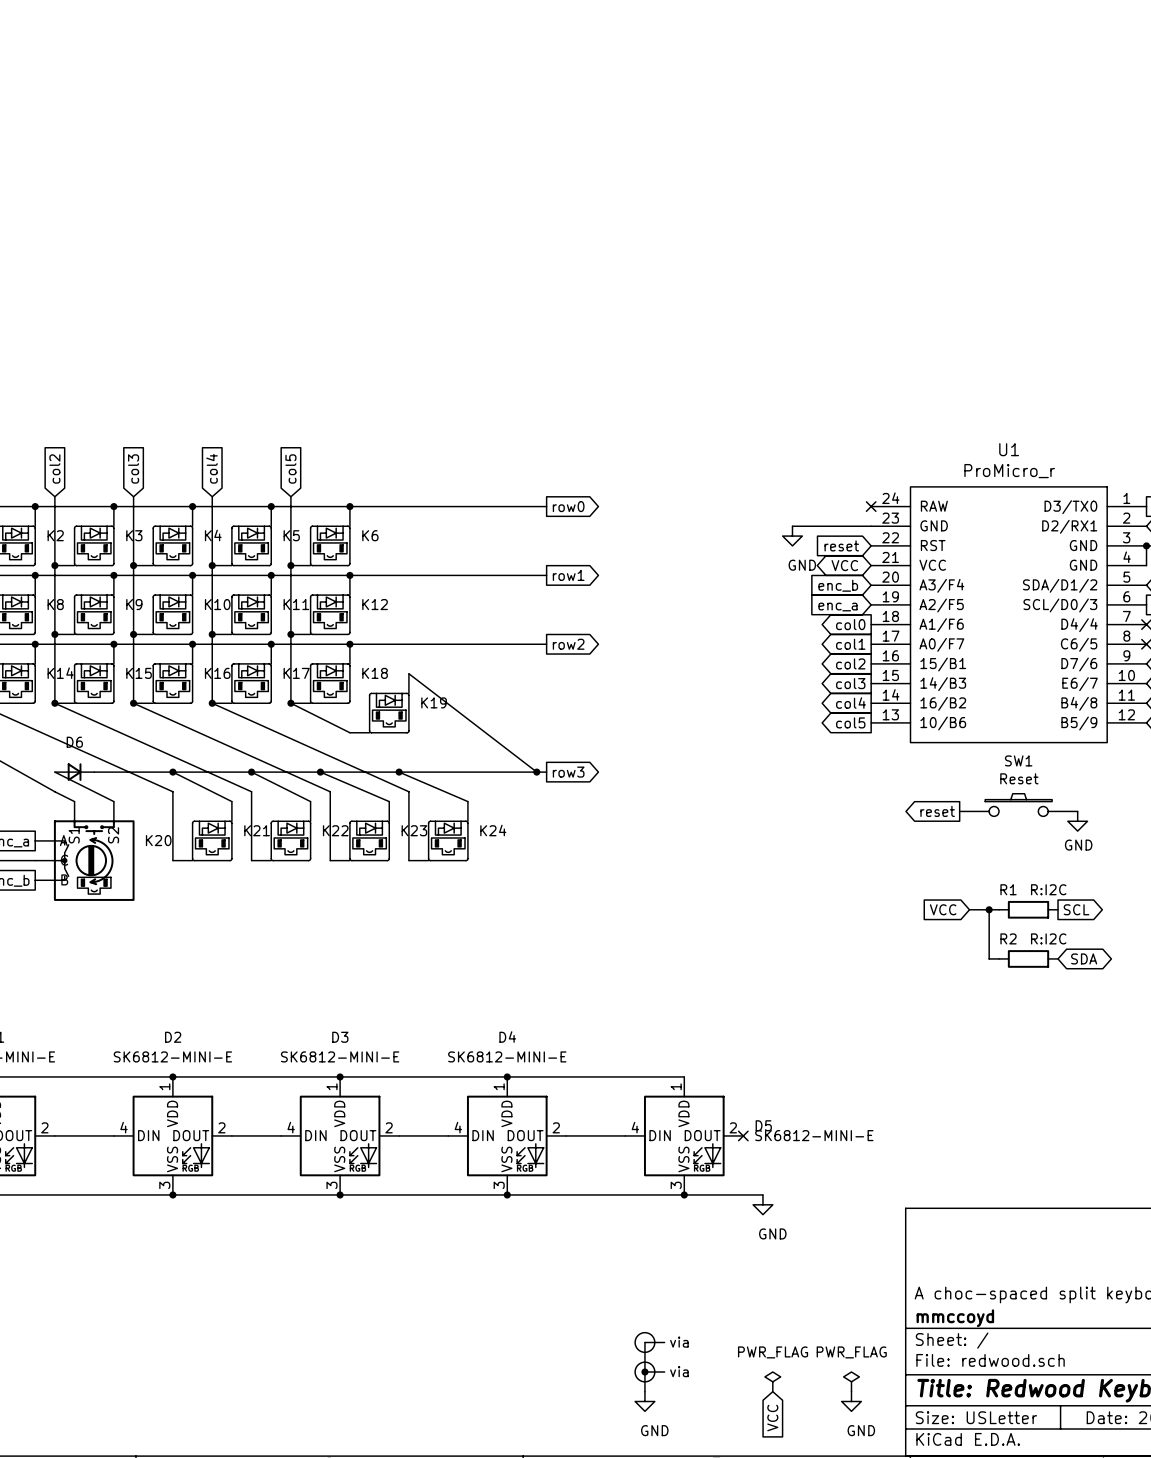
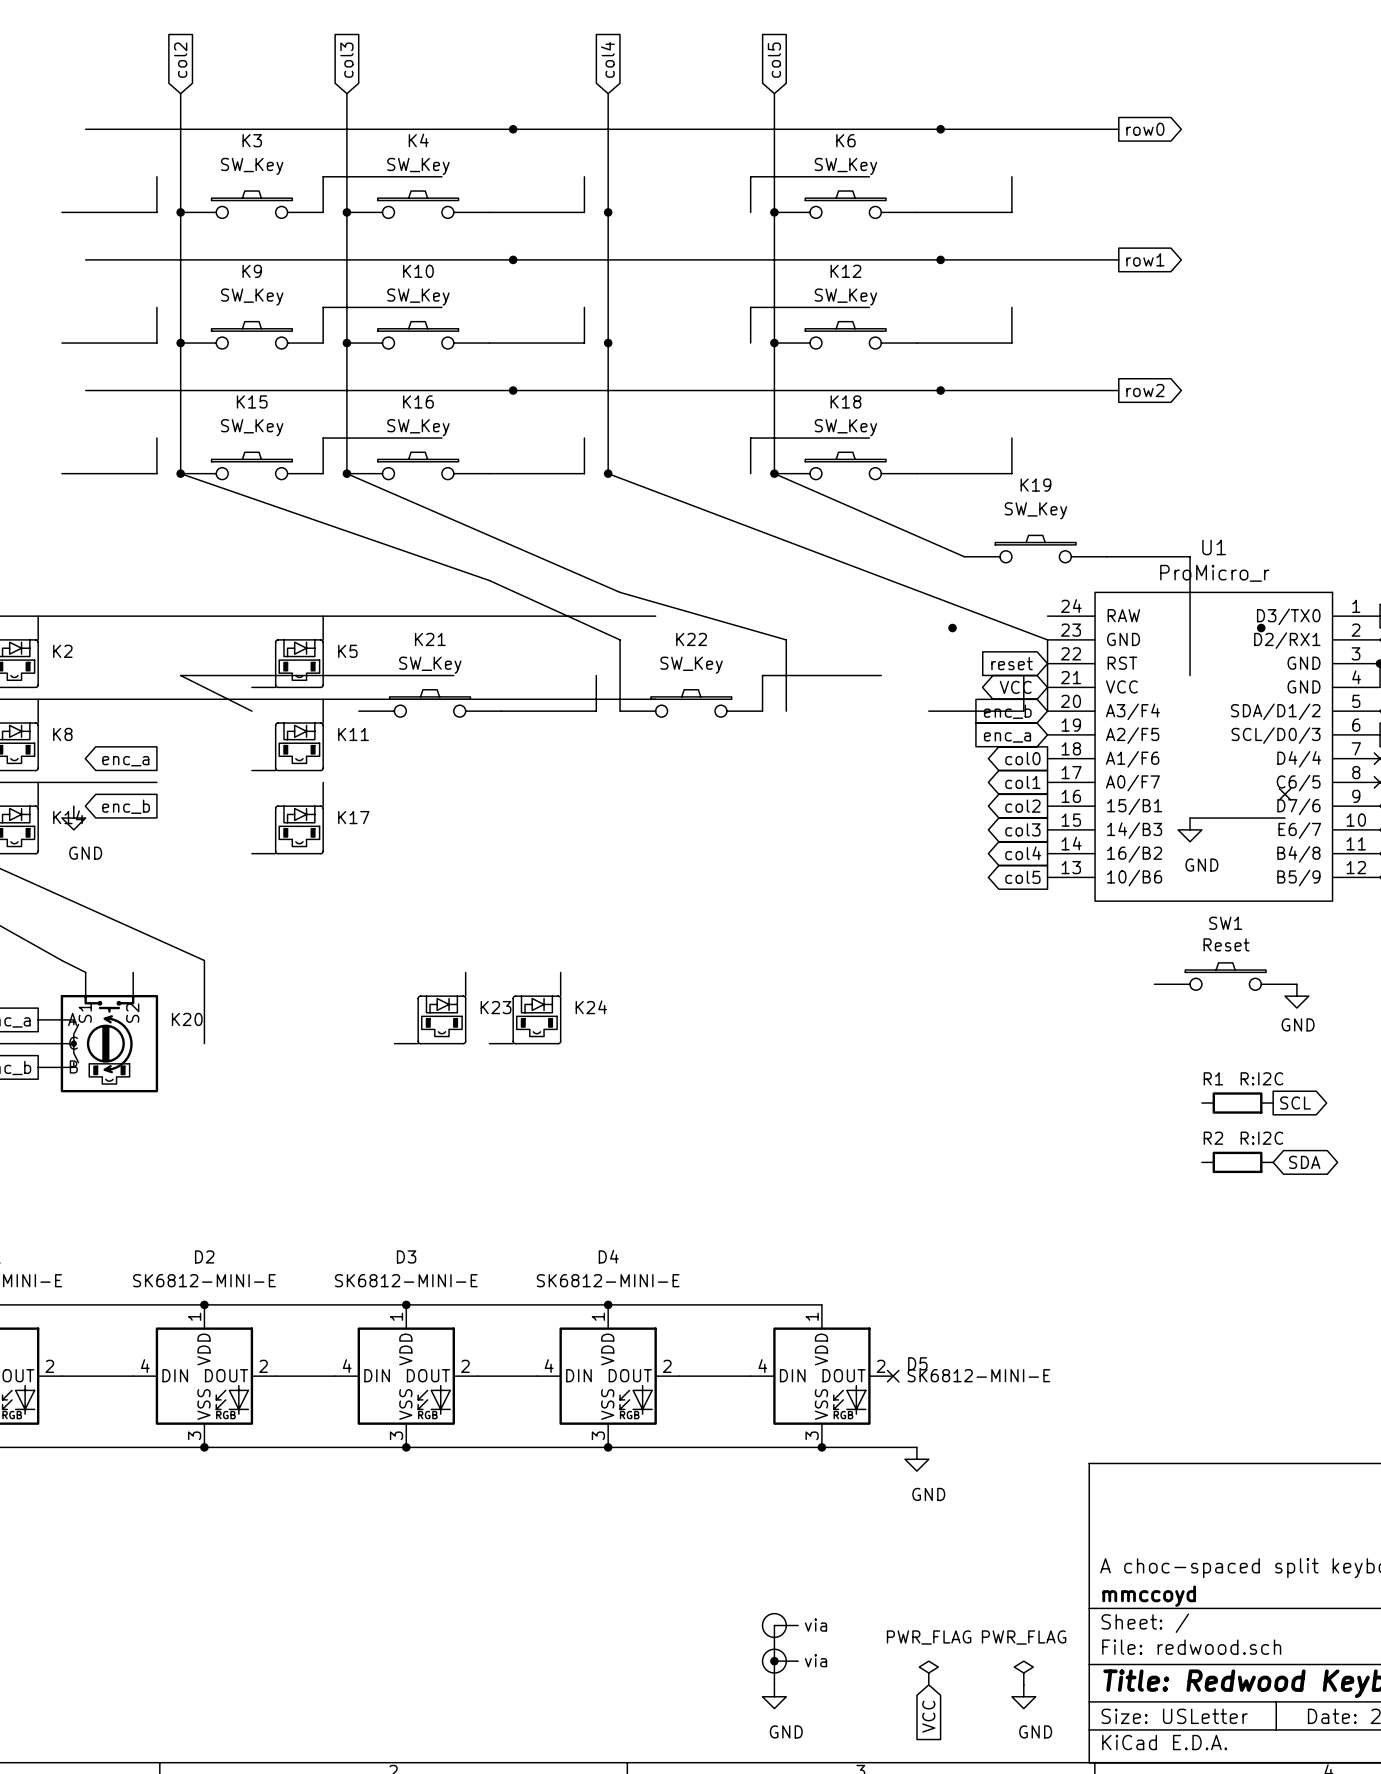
global label: none -> col4 (607, 59)
global label: none -> col2 (180, 60)
global label: none -> col3 (346, 60)
global label: none -> col5 (774, 60)
wire: none -> (180, 93) (180, 473) (489, 580) (620, 639) (620, 711)
wire: none -> (346, 93) (346, 473) (620, 592) (786, 639) (786, 711)
wire: none -> (608, 93) (608, 473) (1047, 639) (1047, 711)
wire: none -> (774, 93) (774, 473) (964, 556)
wire: none -> (85, 129) (1118, 129)
junction: none -> (513, 129)
junction: none -> (940, 129)
global label: none -> row0 (1145, 129)
K3 value: none -> SW_Key (252, 166)
K4 value: none -> SW_Key (418, 166)
K6 value: none -> SW_Key (845, 166)
wire: none -> (156, 176) (156, 212) (61, 212)
wire: none -> (441, 176) (323, 176) (323, 212)
wire: none -> (584, 176) (584, 212) (489, 212)
wire: none -> (869, 176) (750, 176) (750, 212)
wire: none -> (1011, 176) (1011, 212) (916, 212)
junction: none -> (180, 212)
junction: none -> (346, 212)
junction: none -> (608, 212)
junction: none -> (774, 212)
wire: none -> (85, 259) (1118, 259)
junction: none -> (513, 259)
junction: none -> (940, 259)
global label: none -> row1 (1145, 259)
K9 value: none -> SW_Key (252, 297)
K10 value: none -> SW_Key (418, 297)
K12 value: none -> SW_Key (845, 297)
wire: none -> (156, 307) (156, 343) (61, 343)
wire: none -> (441, 307) (323, 307) (323, 343)
wire: none -> (584, 307) (584, 343) (489, 343)
wire: none -> (869, 307) (750, 307) (750, 343)
wire: none -> (1011, 307) (1011, 343) (916, 343)
junction: none -> (180, 343)
junction: none -> (346, 343)
junction: none -> (608, 343)
junction: none -> (774, 343)
wire: none -> (85, 390) (1118, 390)
junction: none -> (513, 390)
junction: none -> (940, 390)
global label: none -> row2 (1145, 390)
K15 value: none -> SW_Key (252, 427)
K16 value: none -> SW_Key (418, 427)
K18 value: none -> SW_Key (845, 427)
wire: none -> (156, 438) (156, 473) (61, 473)
wire: none -> (441, 438) (323, 438) (323, 473)
wire: none -> (584, 438) (584, 473) (489, 473)
wire: none -> (869, 438) (750, 438) (750, 473)
wire: none -> (1011, 438) (1011, 473) (916, 473)
junction: none -> (180, 473)
junction: none -> (346, 473)
junction: none -> (608, 473)
junction: none -> (774, 473)
K19 value: none -> SW_Key (1035, 510)
wire: none -> (1106, 556) (1190, 556) (1190, 675)
global label: col2 (54, 468) -> none
global label: col3 (133, 468) -> none
global label: col4 (212, 468) -> none
global label: col5 (290, 468) -> none
wire: (54, 496) (54, 703) (251, 791) (251, 860) -> none
wire: (133, 496) (133, 703) (330, 791) (330, 860) -> none
wire: (212, 496) (212, 703) (408, 791) (408, 860) -> none
wire: (290, 496) (290, 703) (349, 732) -> none
junction: (35, 506) -> none
K3 symbol: [54, 506, 114, 566] -> [180, 191, 324, 219]
junction: (113, 506) -> none
K4 symbol: [133, 506, 193, 566] -> [346, 191, 490, 219]
junction: (192, 506) -> none
junction: (271, 506) -> none
K6 symbol: [290, 506, 350, 566] -> [774, 191, 917, 219]
junction: (349, 506) -> none
global label: row0 (568, 506) -> none
no-connect mark: (871, 506) -> none
junction: none -> (952, 628)
junction: none -> (1261, 628)
wire: (792, 526) (871, 526) -> none
K3 name position: K3 (134, 535) -> K3 (252, 140)
K4 name position: K4 (213, 535) -> K4 (418, 140)
K6 name position: K6 (370, 535) -> K6 (845, 140)
power symbol: GND (792, 536) -> none
K21 value: none -> SW_Key (430, 665)
K22 value: none -> SW_Key (691, 665)
wire: none -> (453, 675) (180, 675) (251, 711)
wire: none -> (596, 675) (596, 711) (501, 711)
wire: none -> (881, 675) (762, 675) (762, 711)
wire: none -> (1023, 675) (1023, 711) (928, 711)
junction: (54, 565) -> none
junction: (133, 565) -> none
junction: (212, 565) -> none
junction: (290, 565) -> none
junction: (35, 575) -> none
K9 symbol: [54, 575, 114, 635] -> [180, 321, 324, 349]
junction: (113, 575) -> none
K10 symbol: [133, 575, 193, 635] -> [346, 321, 490, 349]
junction: (192, 575) -> none
junction: (271, 575) -> none
K12 symbol: [290, 575, 350, 635] -> [774, 321, 917, 349]
junction: (349, 575) -> none
global label: row1 (568, 575) -> none
K9 name position: K9 (134, 604) -> K9 (252, 271)
K10 name position: K10 (217, 604) -> K10 (418, 271)
K12 name position: K12 (375, 604) -> K12 (845, 271)
global label: none -> enc_a (125, 761)
junction: (54, 634) -> none
junction: (133, 634) -> none
junction: (212, 634) -> none
junction: (290, 634) -> none
junction: (35, 644) -> none
K15 symbol: [54, 644, 114, 704] -> [180, 452, 324, 480]
junction: (113, 644) -> none
wire: (133, 644) (546, 644) -> none
K16 symbol: [133, 644, 193, 704] -> [346, 452, 490, 480]
junction: (192, 644) -> none
junction: (271, 644) -> none
K18 symbol: [290, 644, 350, 704] -> [774, 452, 917, 480]
junction: (349, 644) -> none
global label: row2 (568, 644) -> none
no-connect mark: none -> (1285, 794)
global label: none -> enc_b (126, 806)
power symbol: none -> GND (73, 818)
K15 name position: K15 (139, 673) -> K15 (252, 401)
K16 name position: K16 (217, 673) -> K16 (418, 401)
K19 symbol: [349, 673, 409, 733] -> [964, 535, 1107, 563]
K18 name position: K18 (375, 673) -> K18 (845, 401)
wire: (408, 673) (536, 772) -> none
wire: none -> (1190, 818) (1285, 818)
power symbol: none -> GND (1190, 829)
K19 name position: K19 (434, 702) -> K19 (1035, 485)
junction: (54, 703) -> none
junction: (133, 703) -> none
junction: (212, 703) -> none
junction: (290, 703) -> none
wire: (54, 772) (113, 801) -> none
D6: (74, 772) -> none
wire: (94, 772) (546, 772) -> none
wire: (172, 772) (231, 801) -> none
junction: (172, 772) -> none
wire: (251, 772) (310, 801) -> none
junction: (251, 772) -> none
wire: (320, 772) (389, 801) -> none
junction: (320, 772) -> none
wire: (399, 772) (467, 801) -> none
junction: (399, 772) -> none
junction: (536, 772) -> none
global label: row3 (568, 772) -> none
K21 symbol: [172, 801, 232, 861] -> [358, 689, 502, 718]
K22 symbol: [251, 801, 311, 861] -> [620, 689, 763, 718]
global label: reset (937, 811) -> none
K21 name position: K21 (257, 830) -> K21 (430, 639)
K22 name position: K22 (335, 830) -> K22 (691, 639)
global label: VCC (943, 909) -> none
wire: (969, 909) (999, 909) -> none
wire: (989, 909) (989, 958) (999, 958) -> none
junction: (989, 909) -> none

